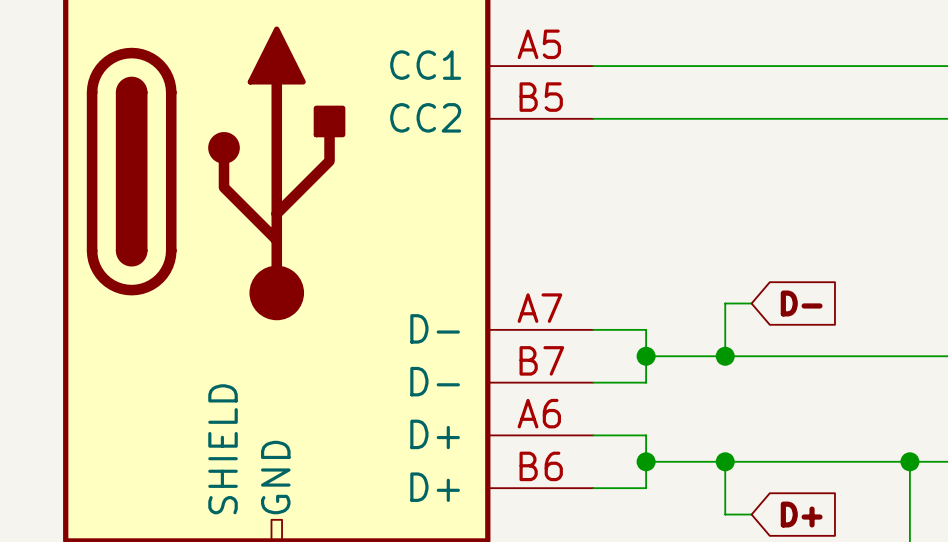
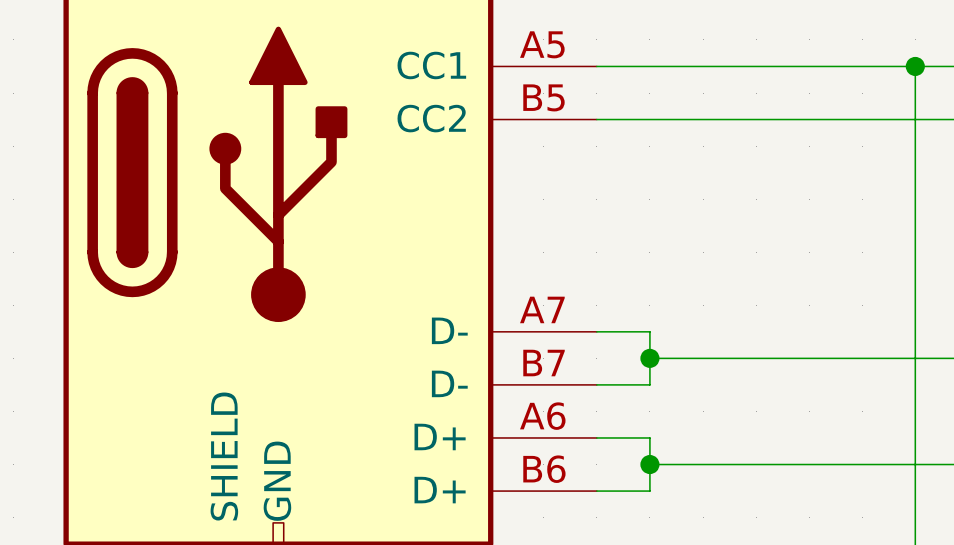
wire: none -> (915, 66) (915, 464)
junction: none -> (915, 66)
wire: (751, 303) (725, 303) (725, 356) -> none
global label: D- (801, 303) -> none
junction: (725, 356) -> none
wire: (725, 461) (725, 514) (751, 514) -> none
junction: (725, 461) -> none
junction: (909, 461) -> none
global label: D+ (801, 514) -> none

